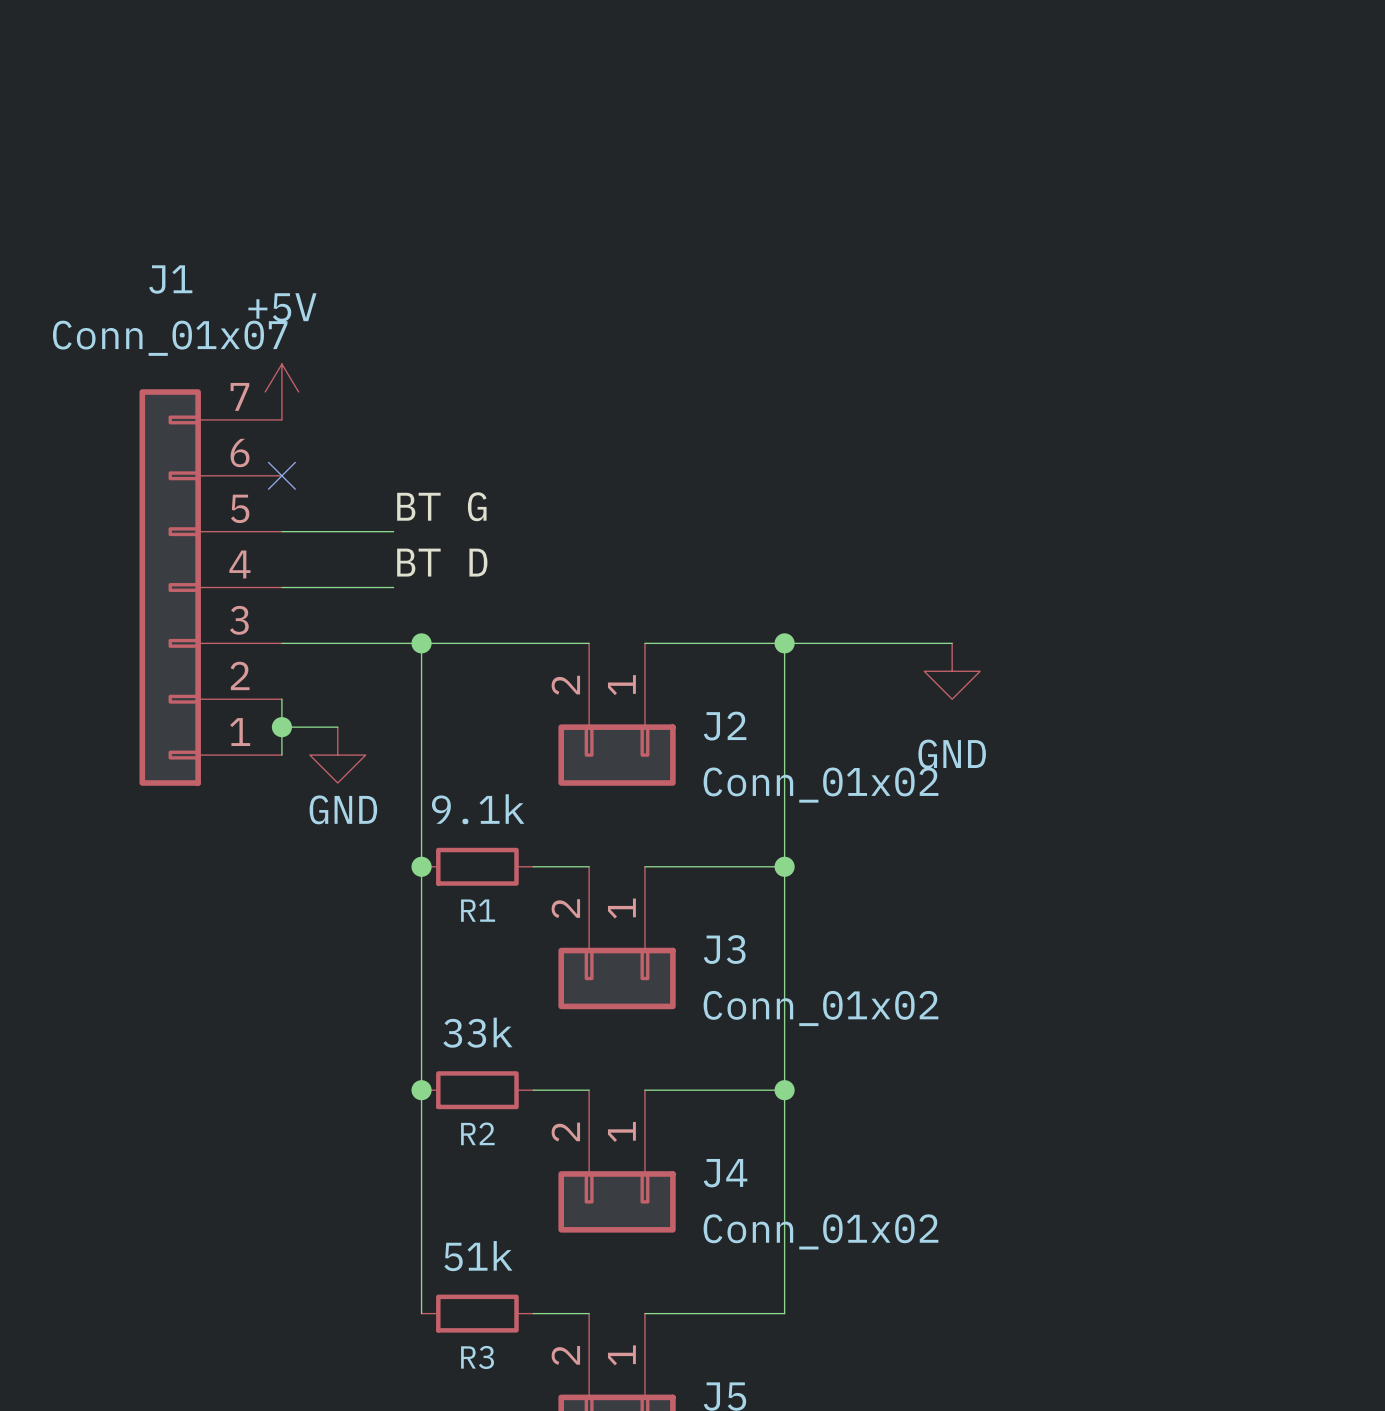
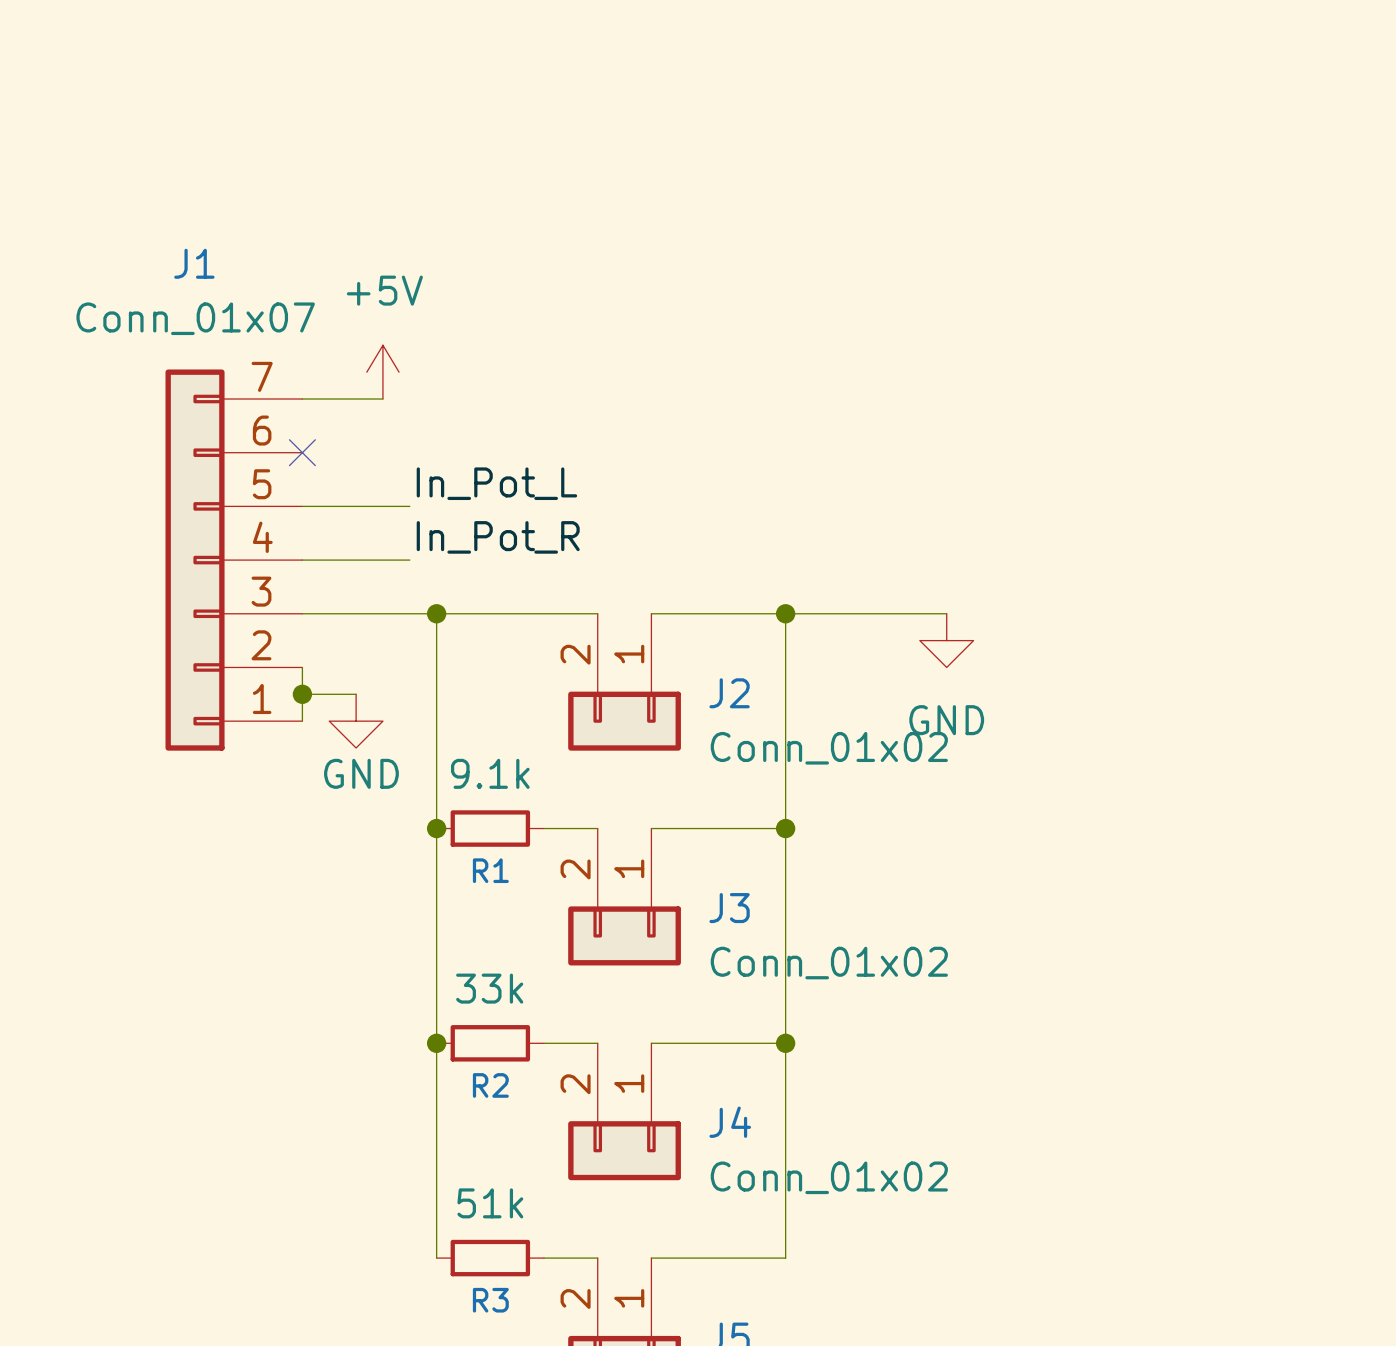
power symbol position: +5V (281, 392) -> +5V (382, 372)
wire: none -> (302, 399) (382, 399)
label: BT G (441, 506) -> In_Pot_L (496, 483)
label: BT D (442, 562) -> In_Pot_R (498, 537)

